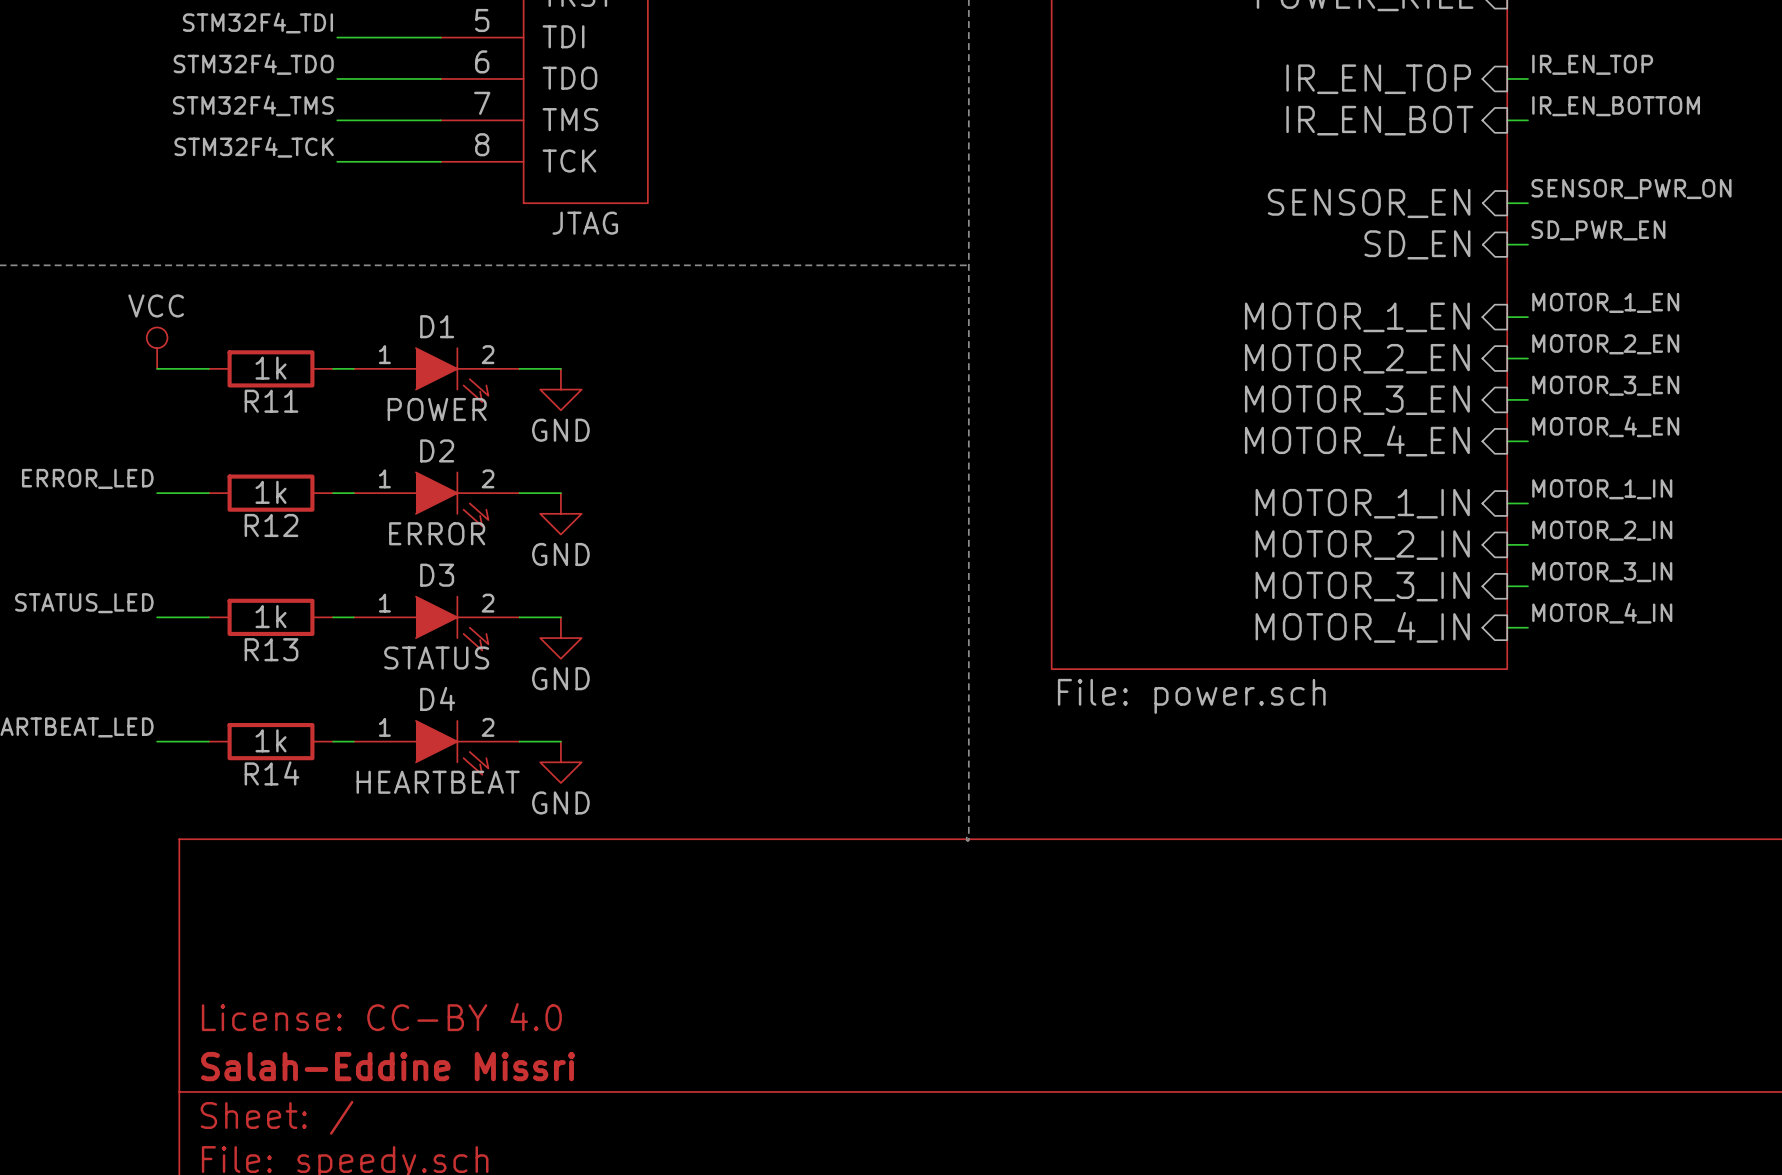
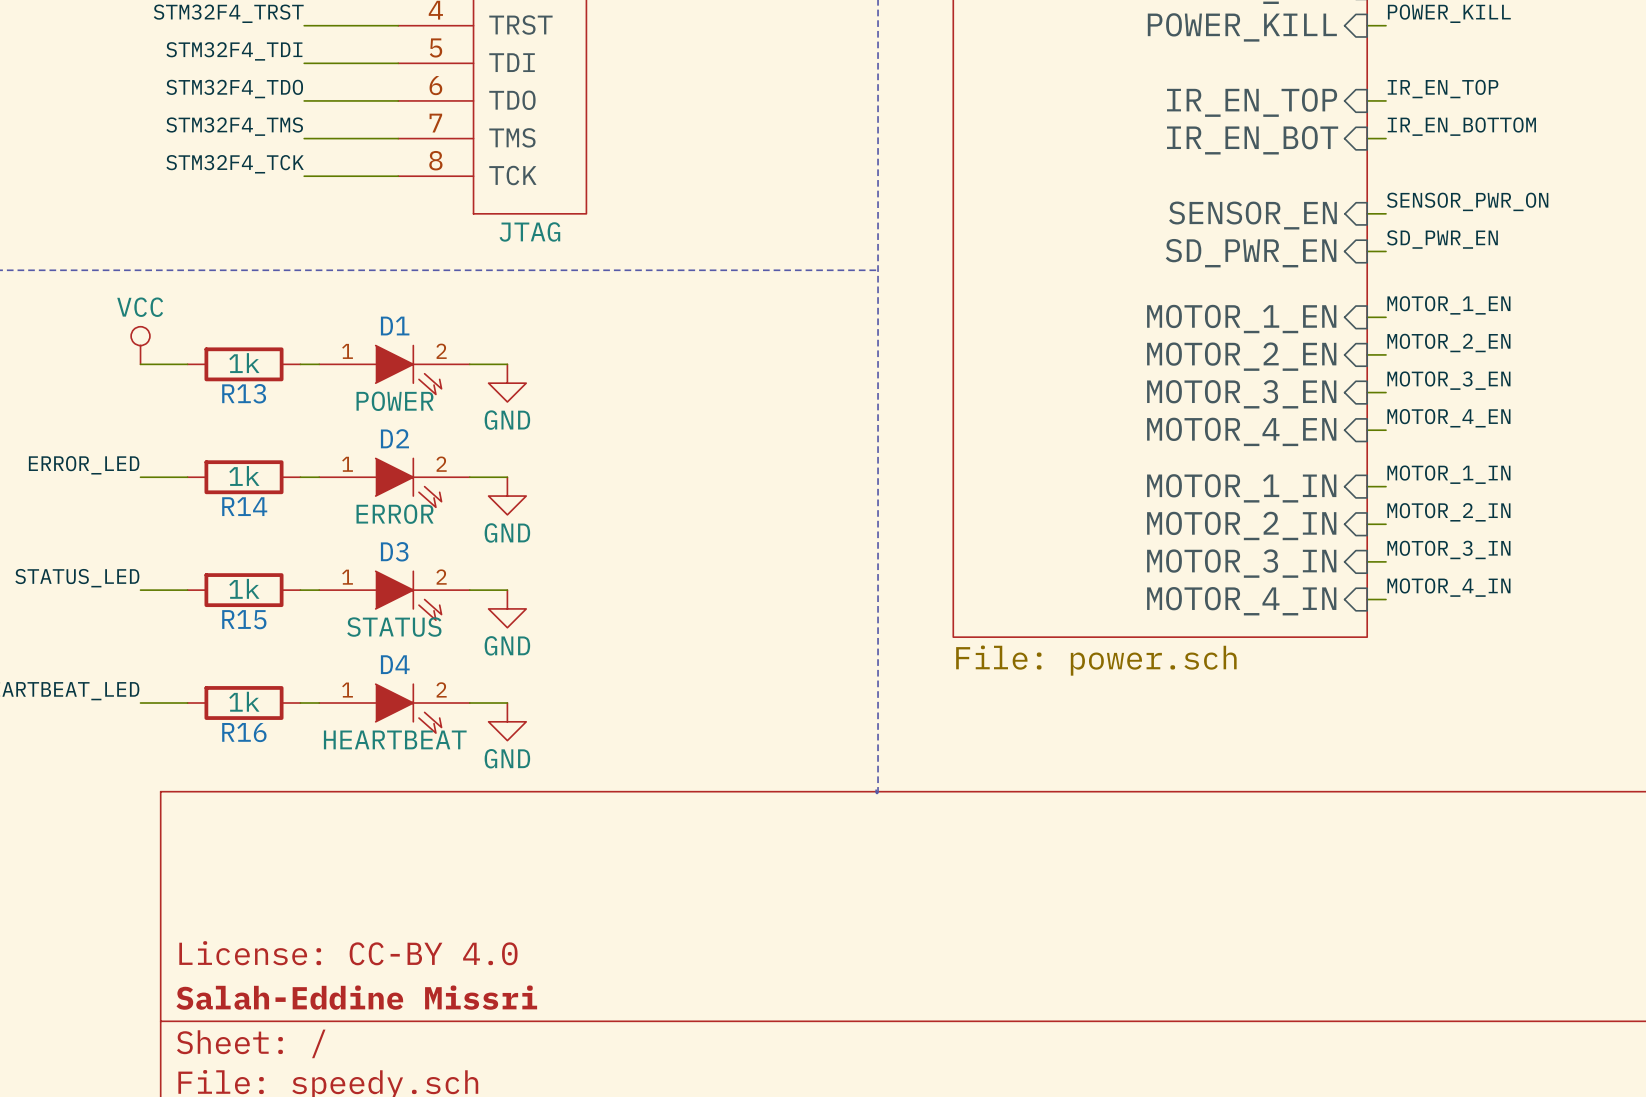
sheet pin: SD_EN (1417, 244) -> SD_PWR_EN (1251, 253)
R11 name: R11 (271, 401) -> R13 (244, 393)
R12 name: R12 (271, 525) -> R14 (244, 506)
R13 name: R13 (271, 649) -> R15 (244, 619)
R14 name: R14 (271, 773) -> R16 (244, 732)

